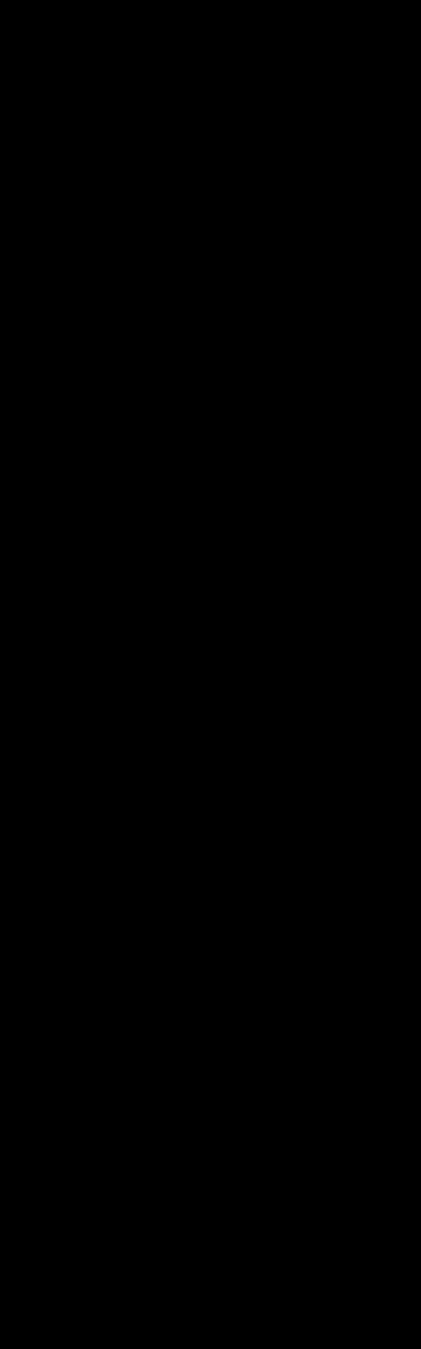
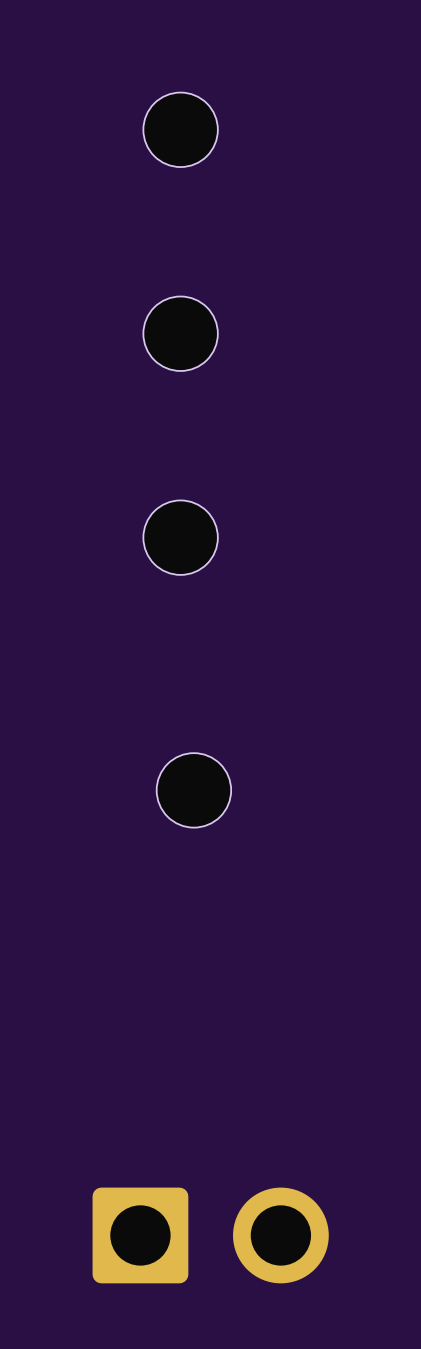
part: none -> (180, 129)
part: none -> (180, 333)
part: none -> (180, 537)
part: none -> (193, 790)
part: none -> (210, 1235)

